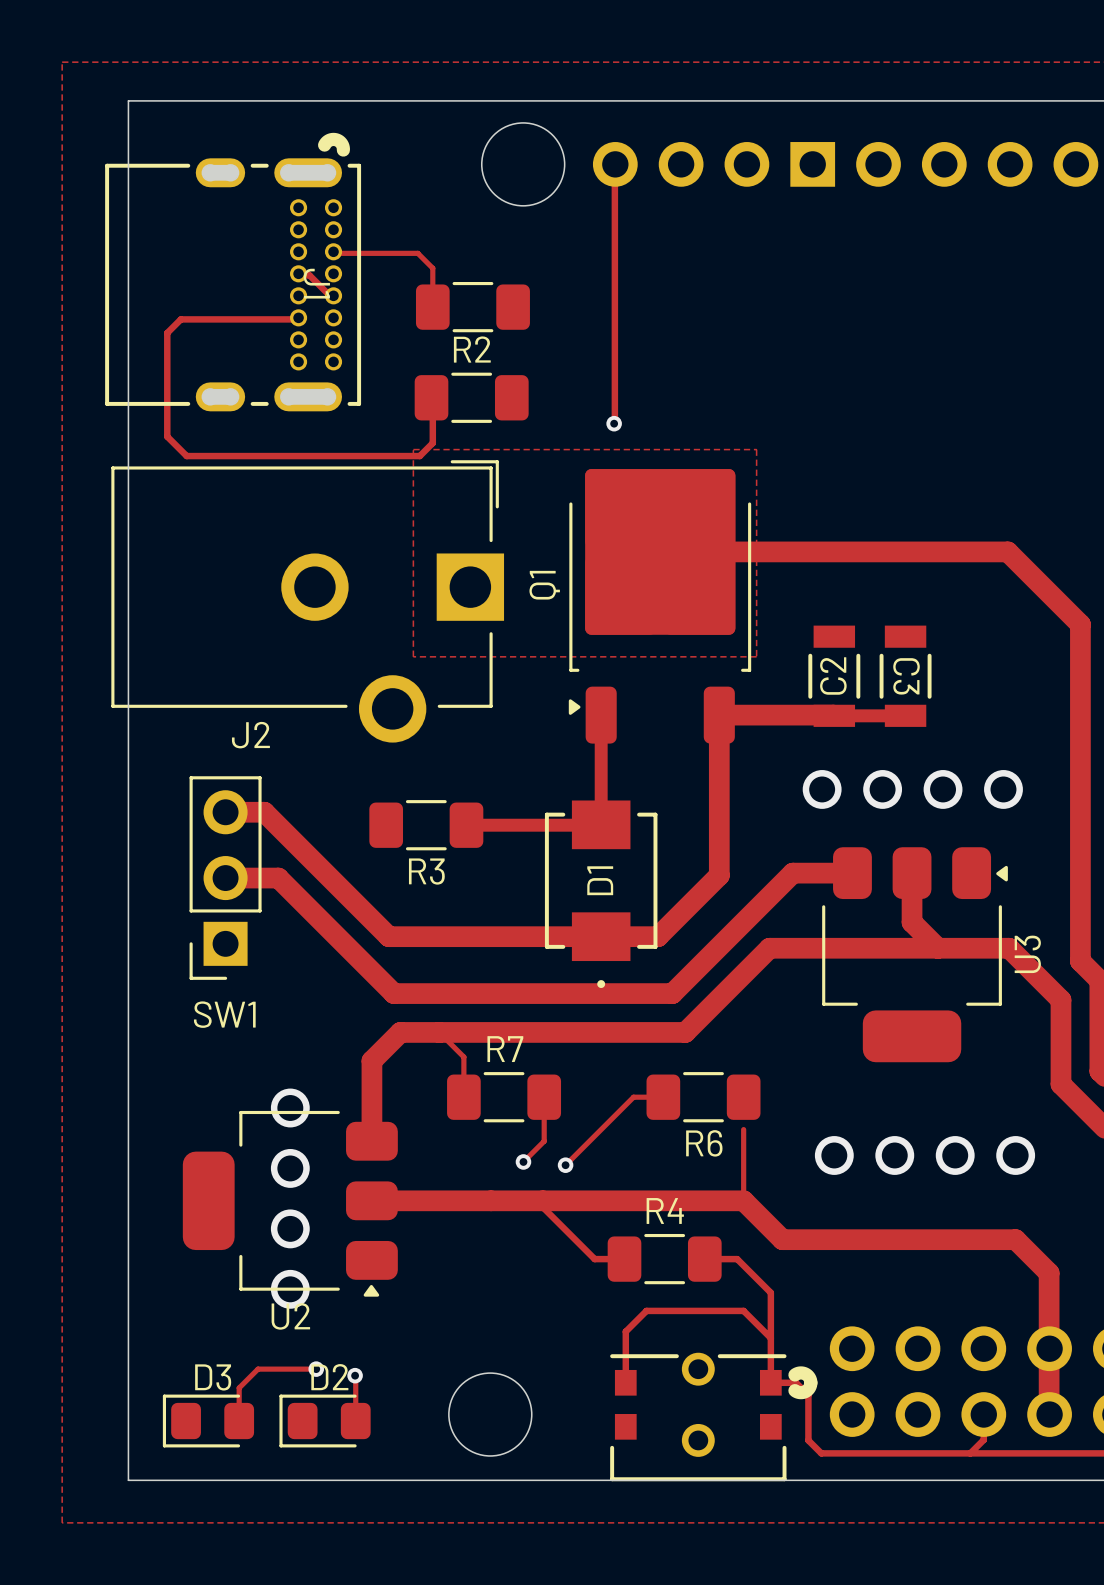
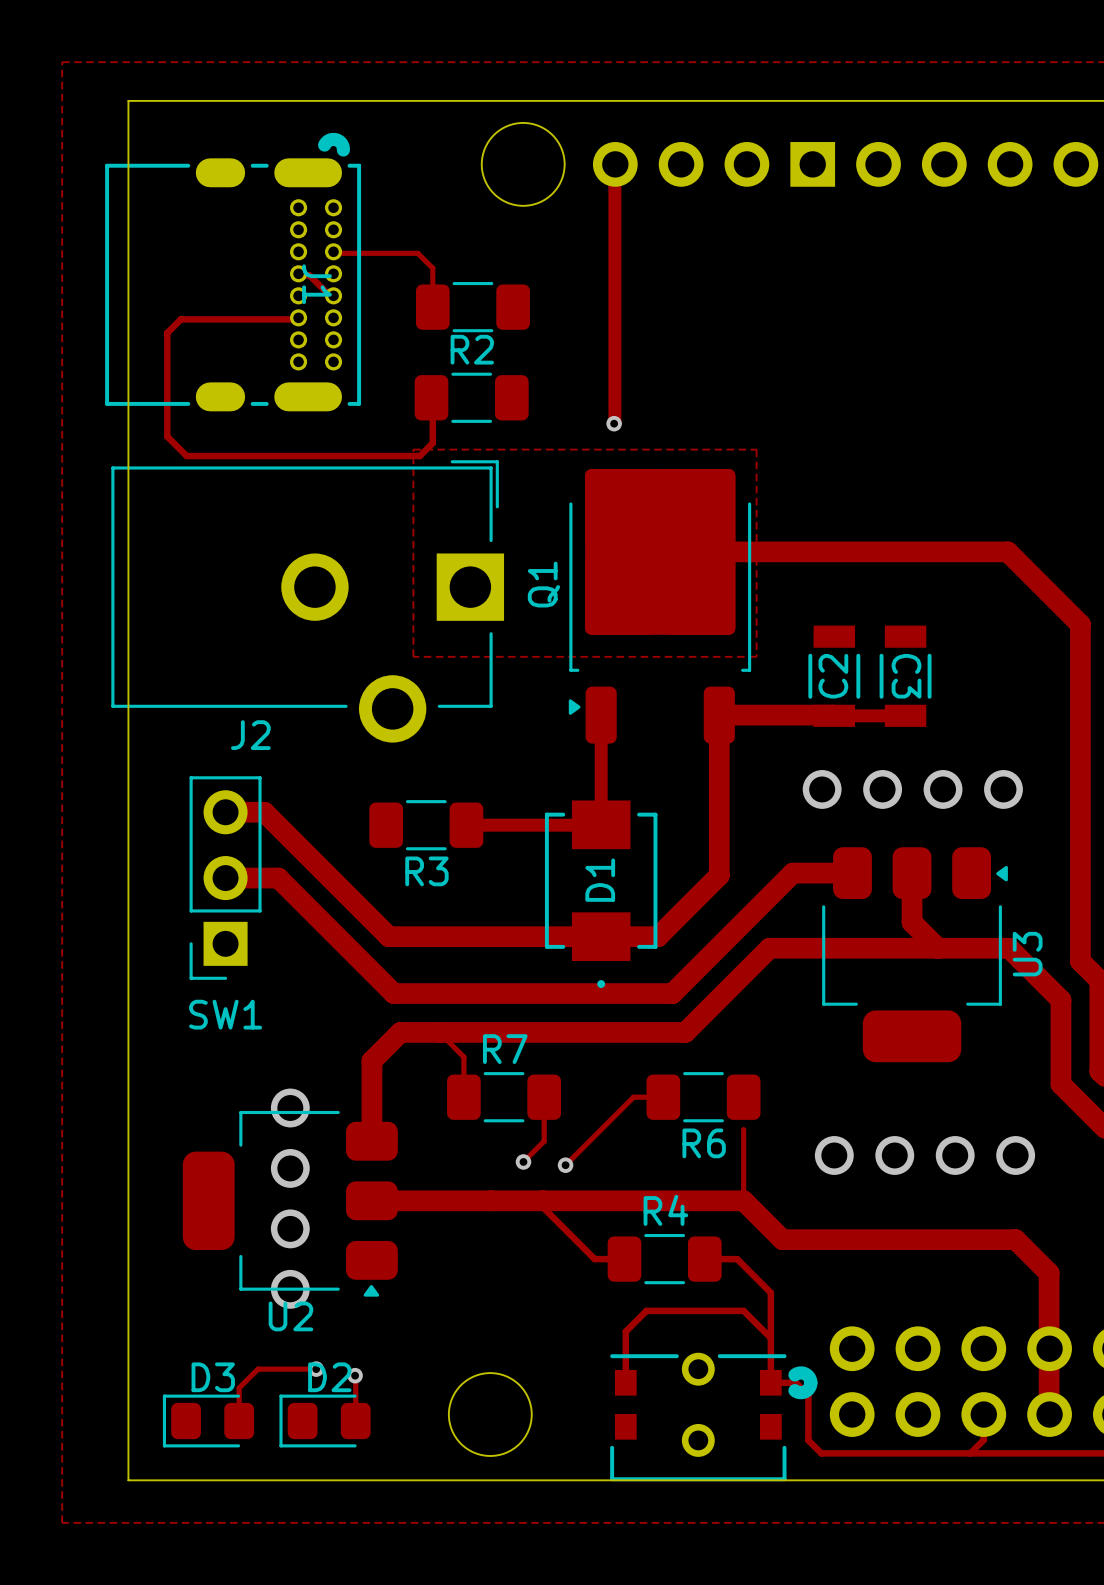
track width: thin (614, 167) (614, 422) -> thick (614, 167) (614, 422)

